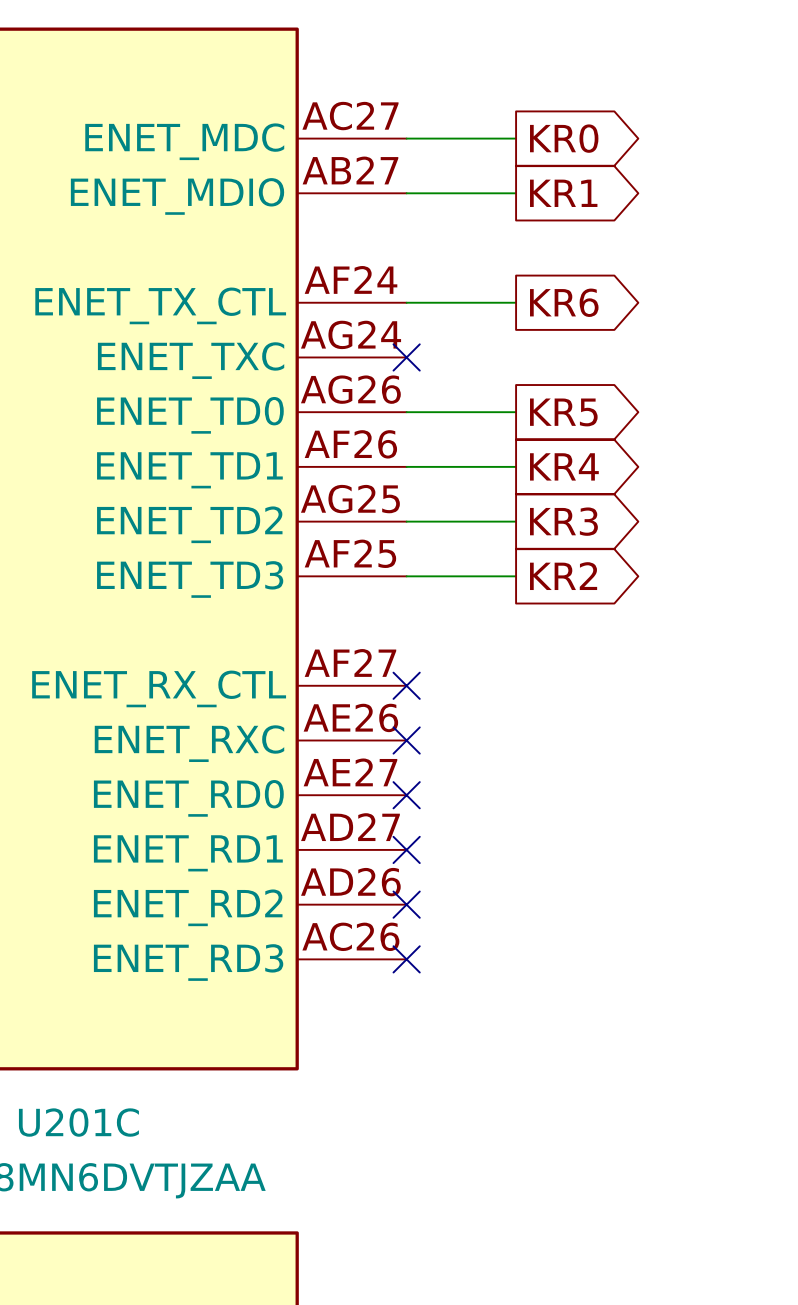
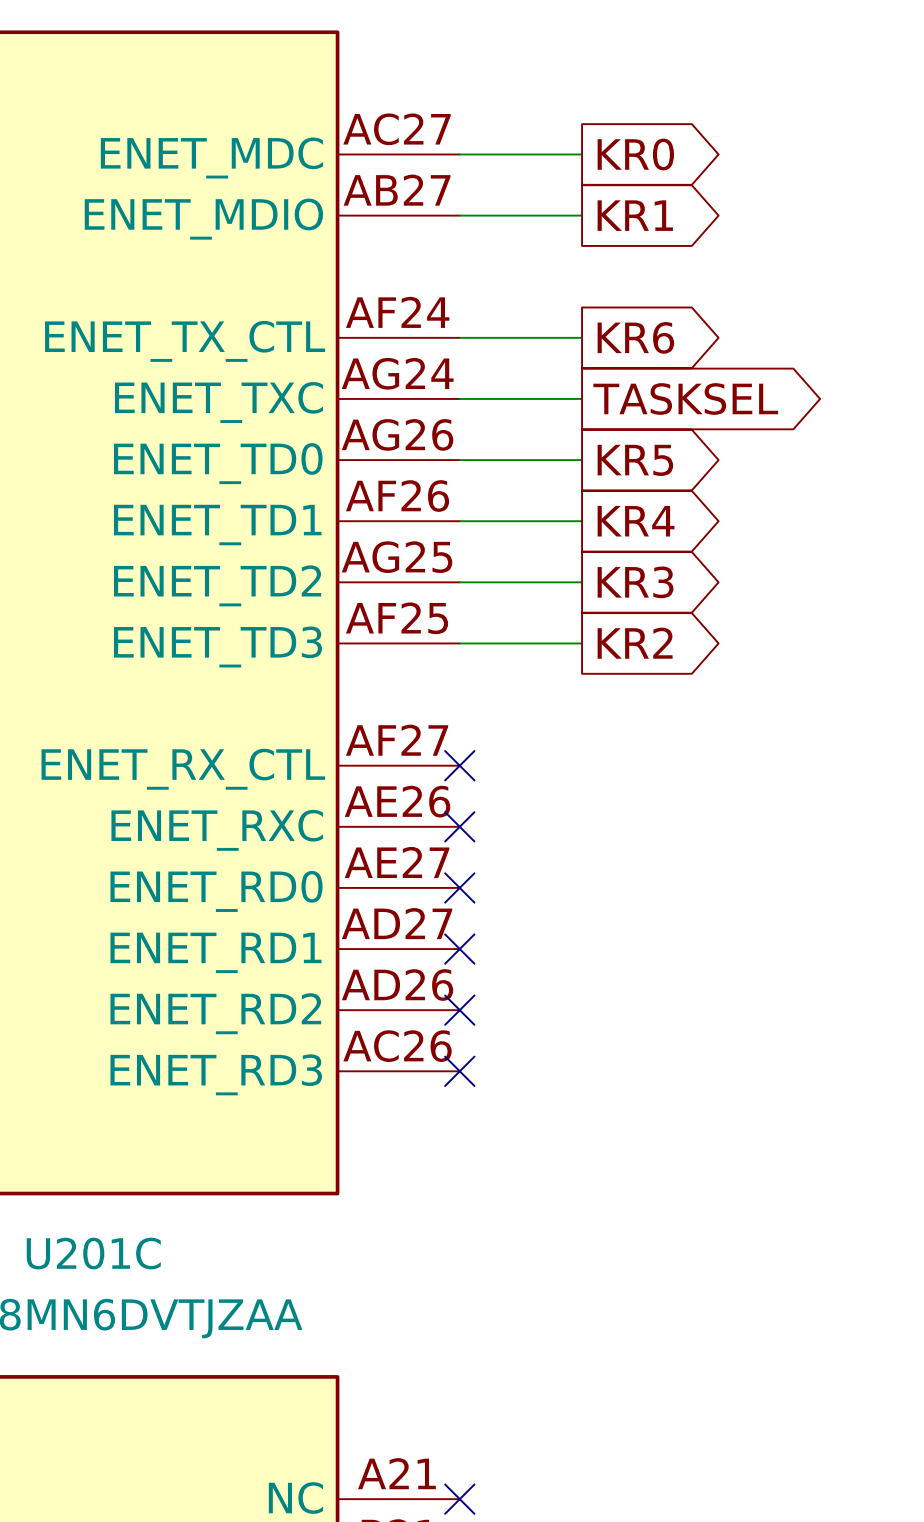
wire: none -> (459, 398) (582, 398)
no-connect mark: (406, 357) -> none
global label: none -> TASKSEL (685, 398)

